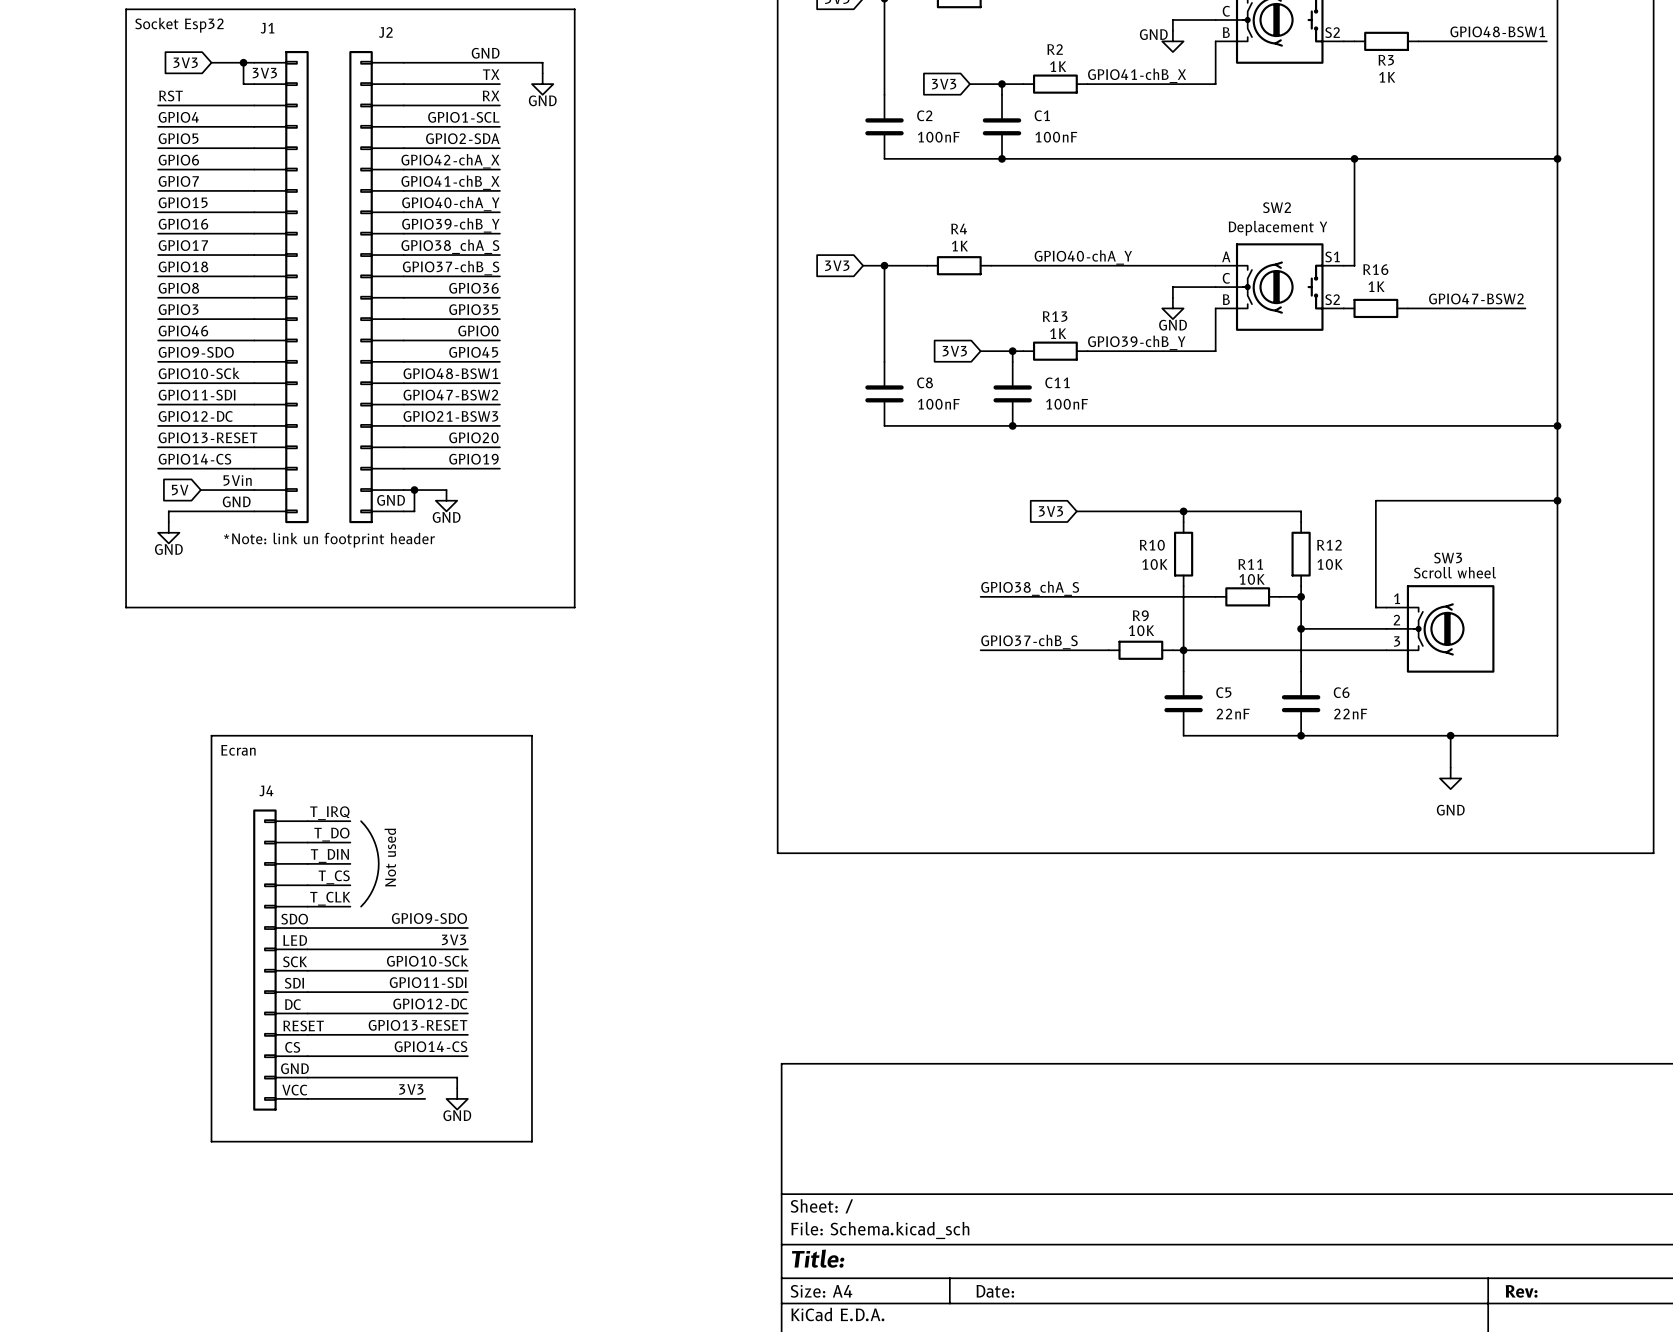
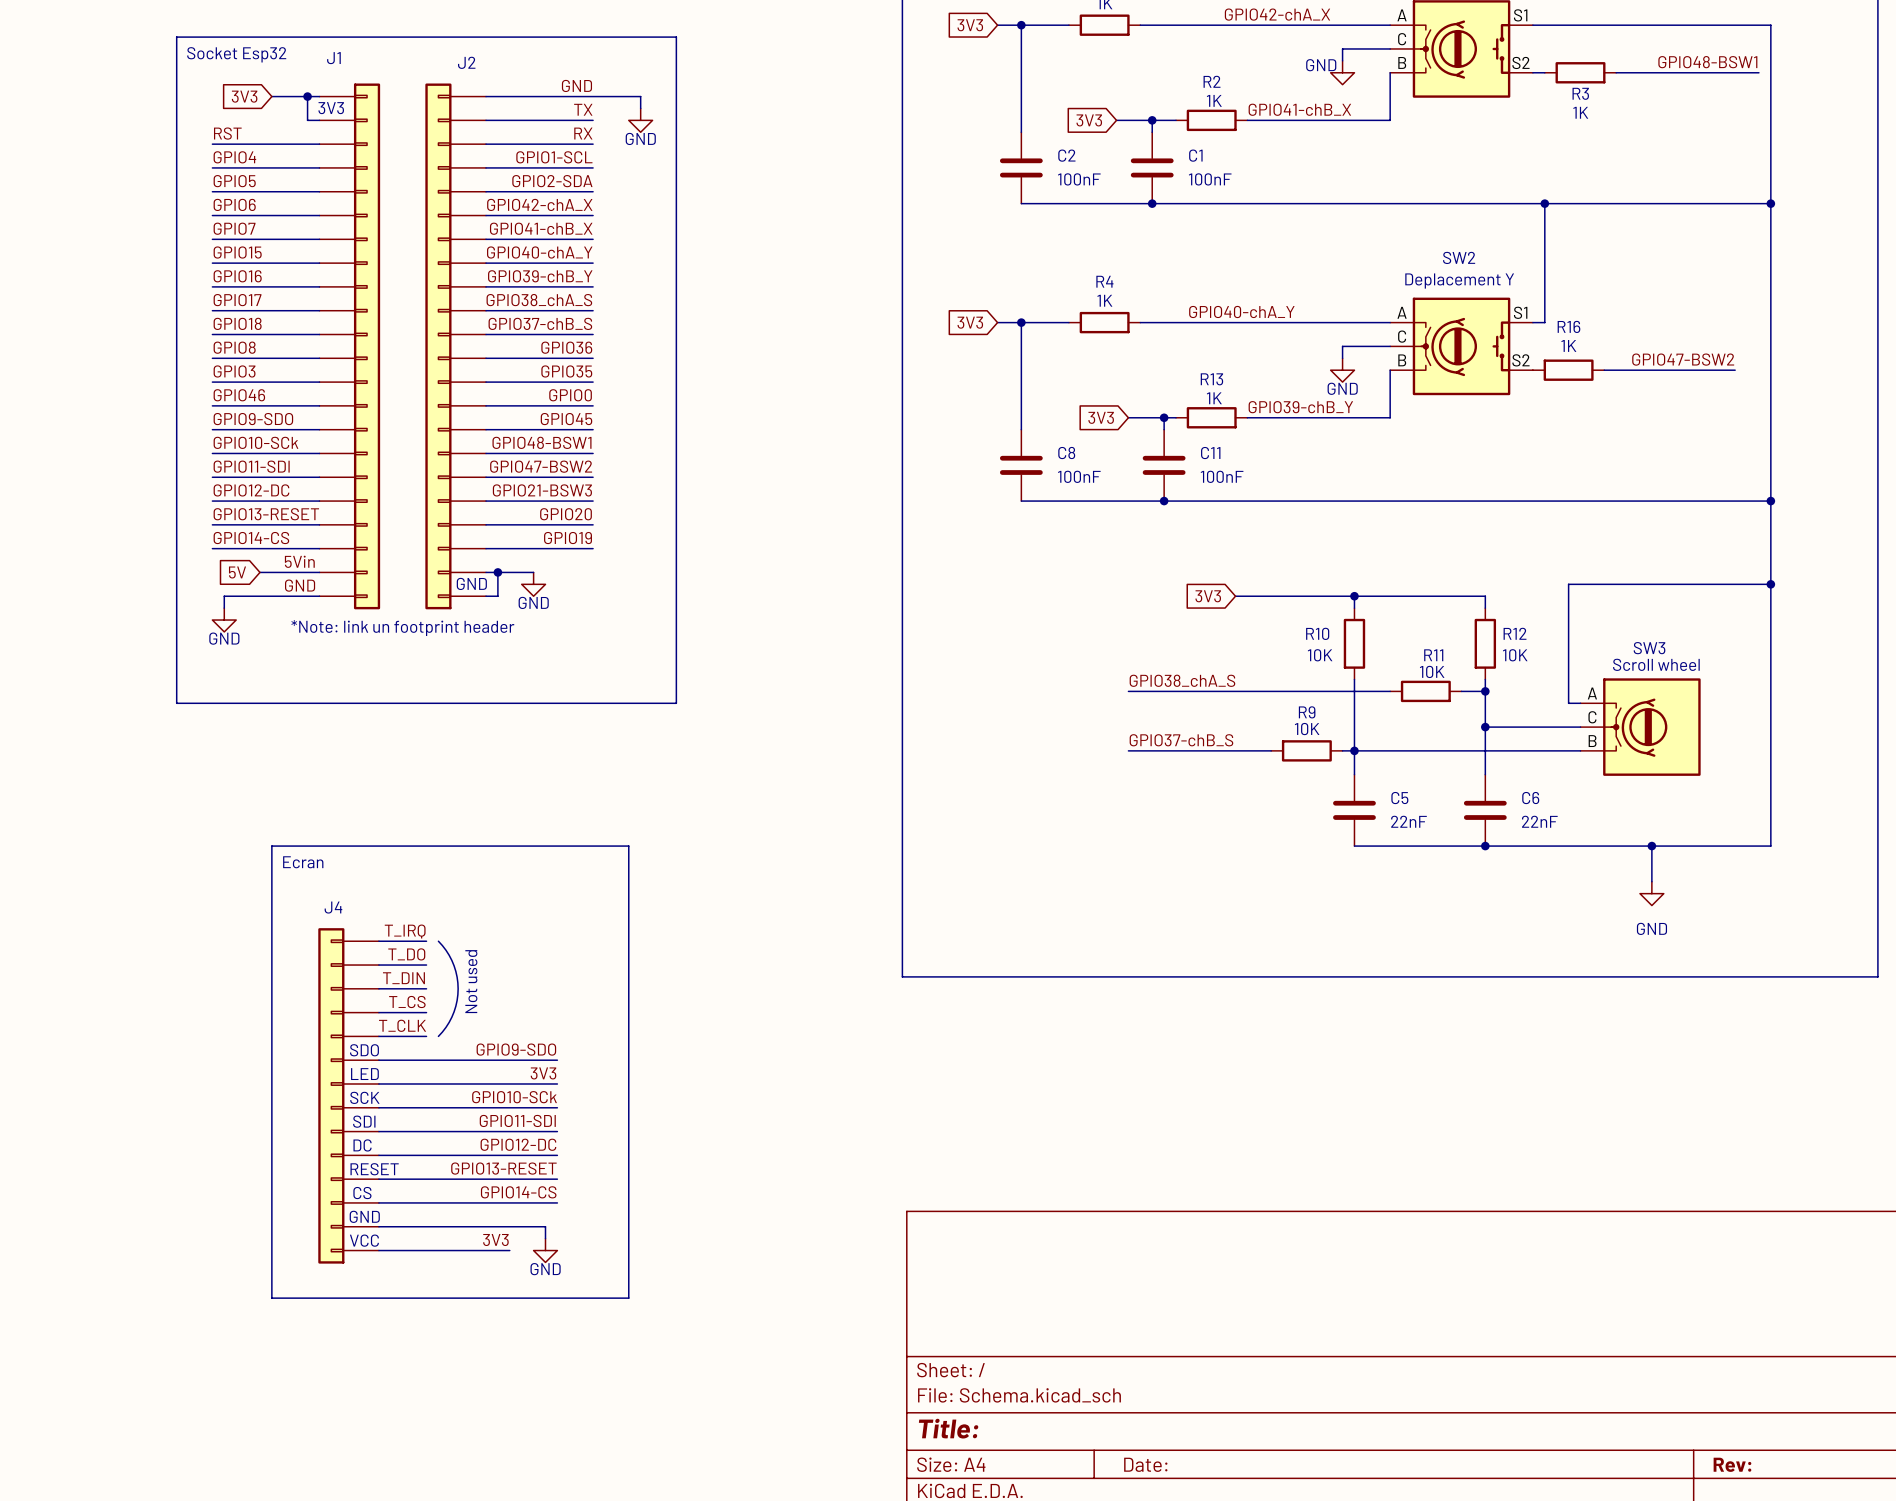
SW3 pin number: 1 (1397, 598) -> A (1592, 693)
SW3 pin number: 2 (1396, 620) -> C (1592, 717)
SW3 pin number: 3 (1397, 641) -> B (1592, 741)

